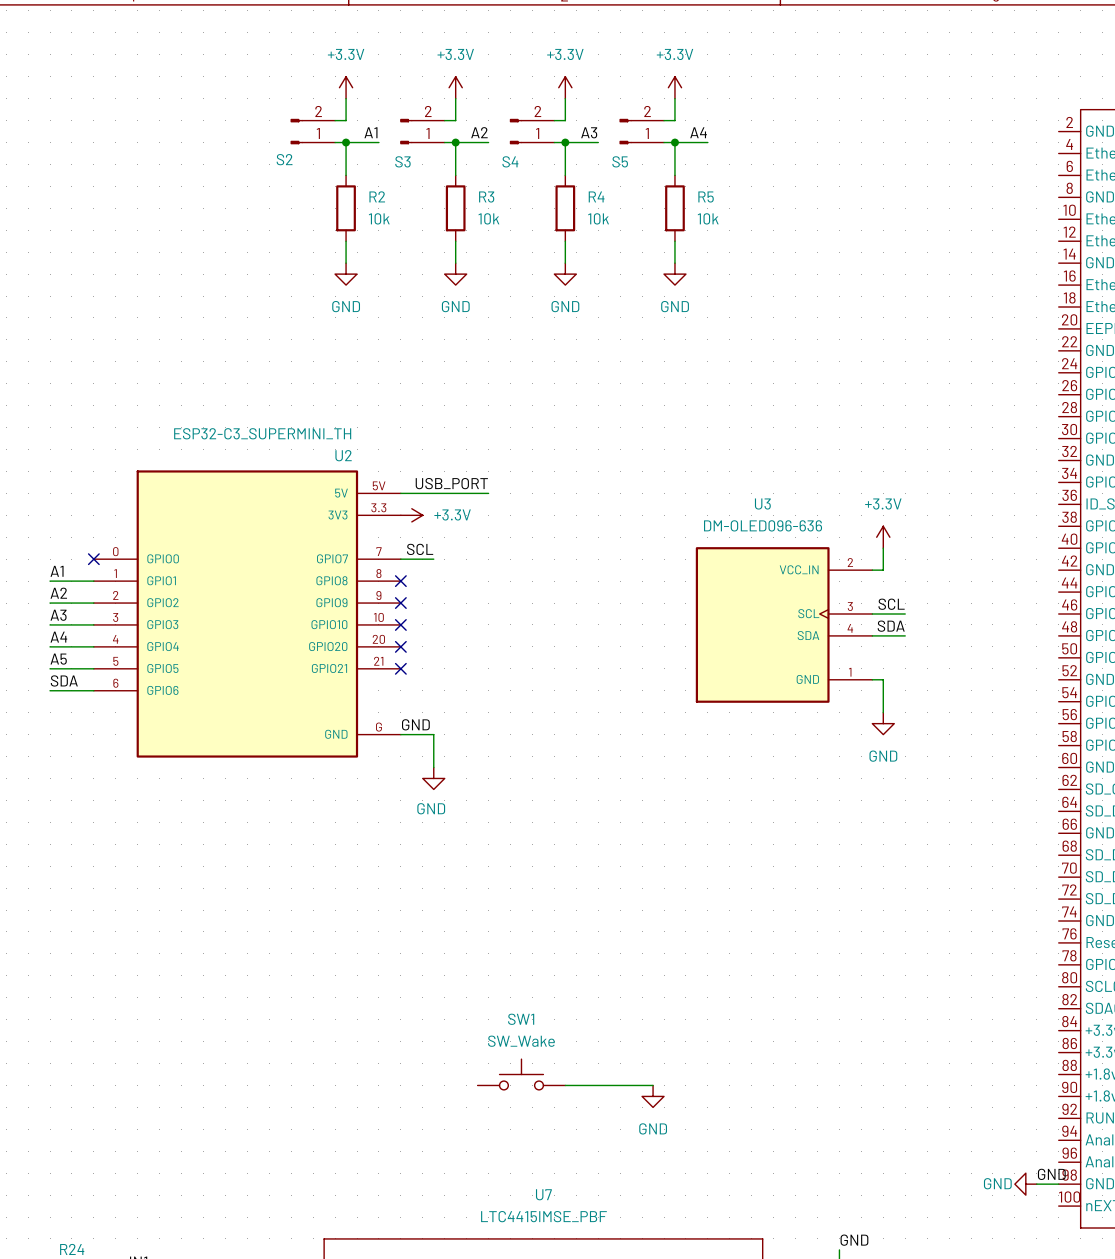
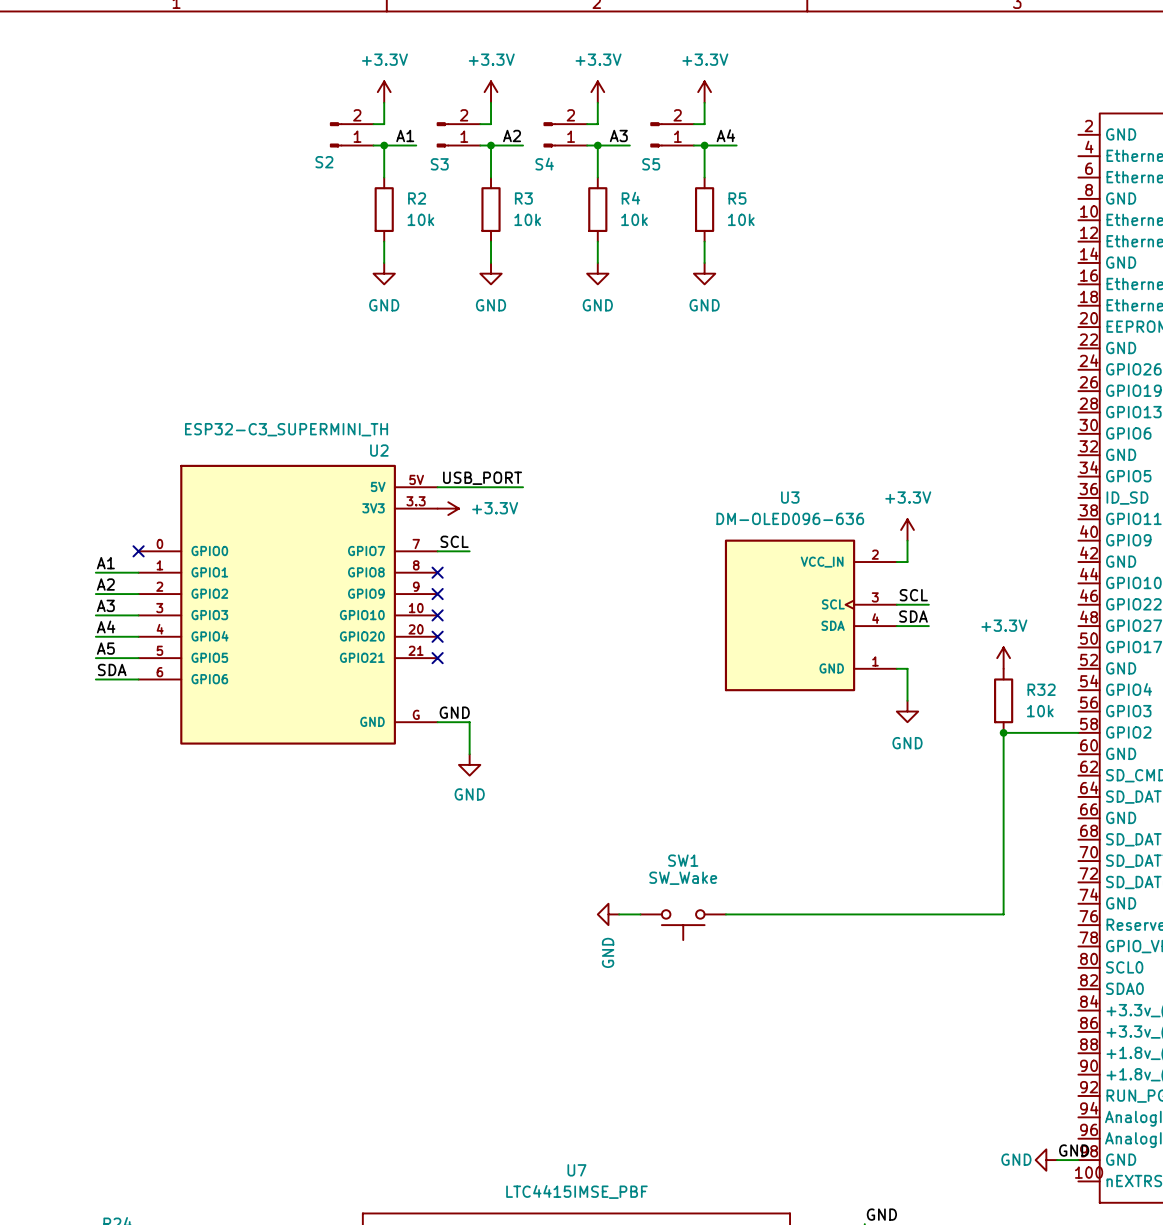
power symbol: none -> +3.3V (1003, 658)
R32: none -> 10k (1003, 700)
junction: none -> (1003, 732)
wire: none -> (1078, 732) (1003, 732) (1003, 914) (725, 914)
wire: none -> (619, 914) (640, 914)
SW1 rotation: 0° (521, 1074) -> 180° (683, 925)
SW1 position: (521, 1074) -> (683, 925)
wire: (565, 1085) (653, 1085) -> none
power symbol rotation: 0° (653, 1096) -> 90° clockwise (608, 914)
power symbol position: GND (653, 1096) -> GND (608, 914)

